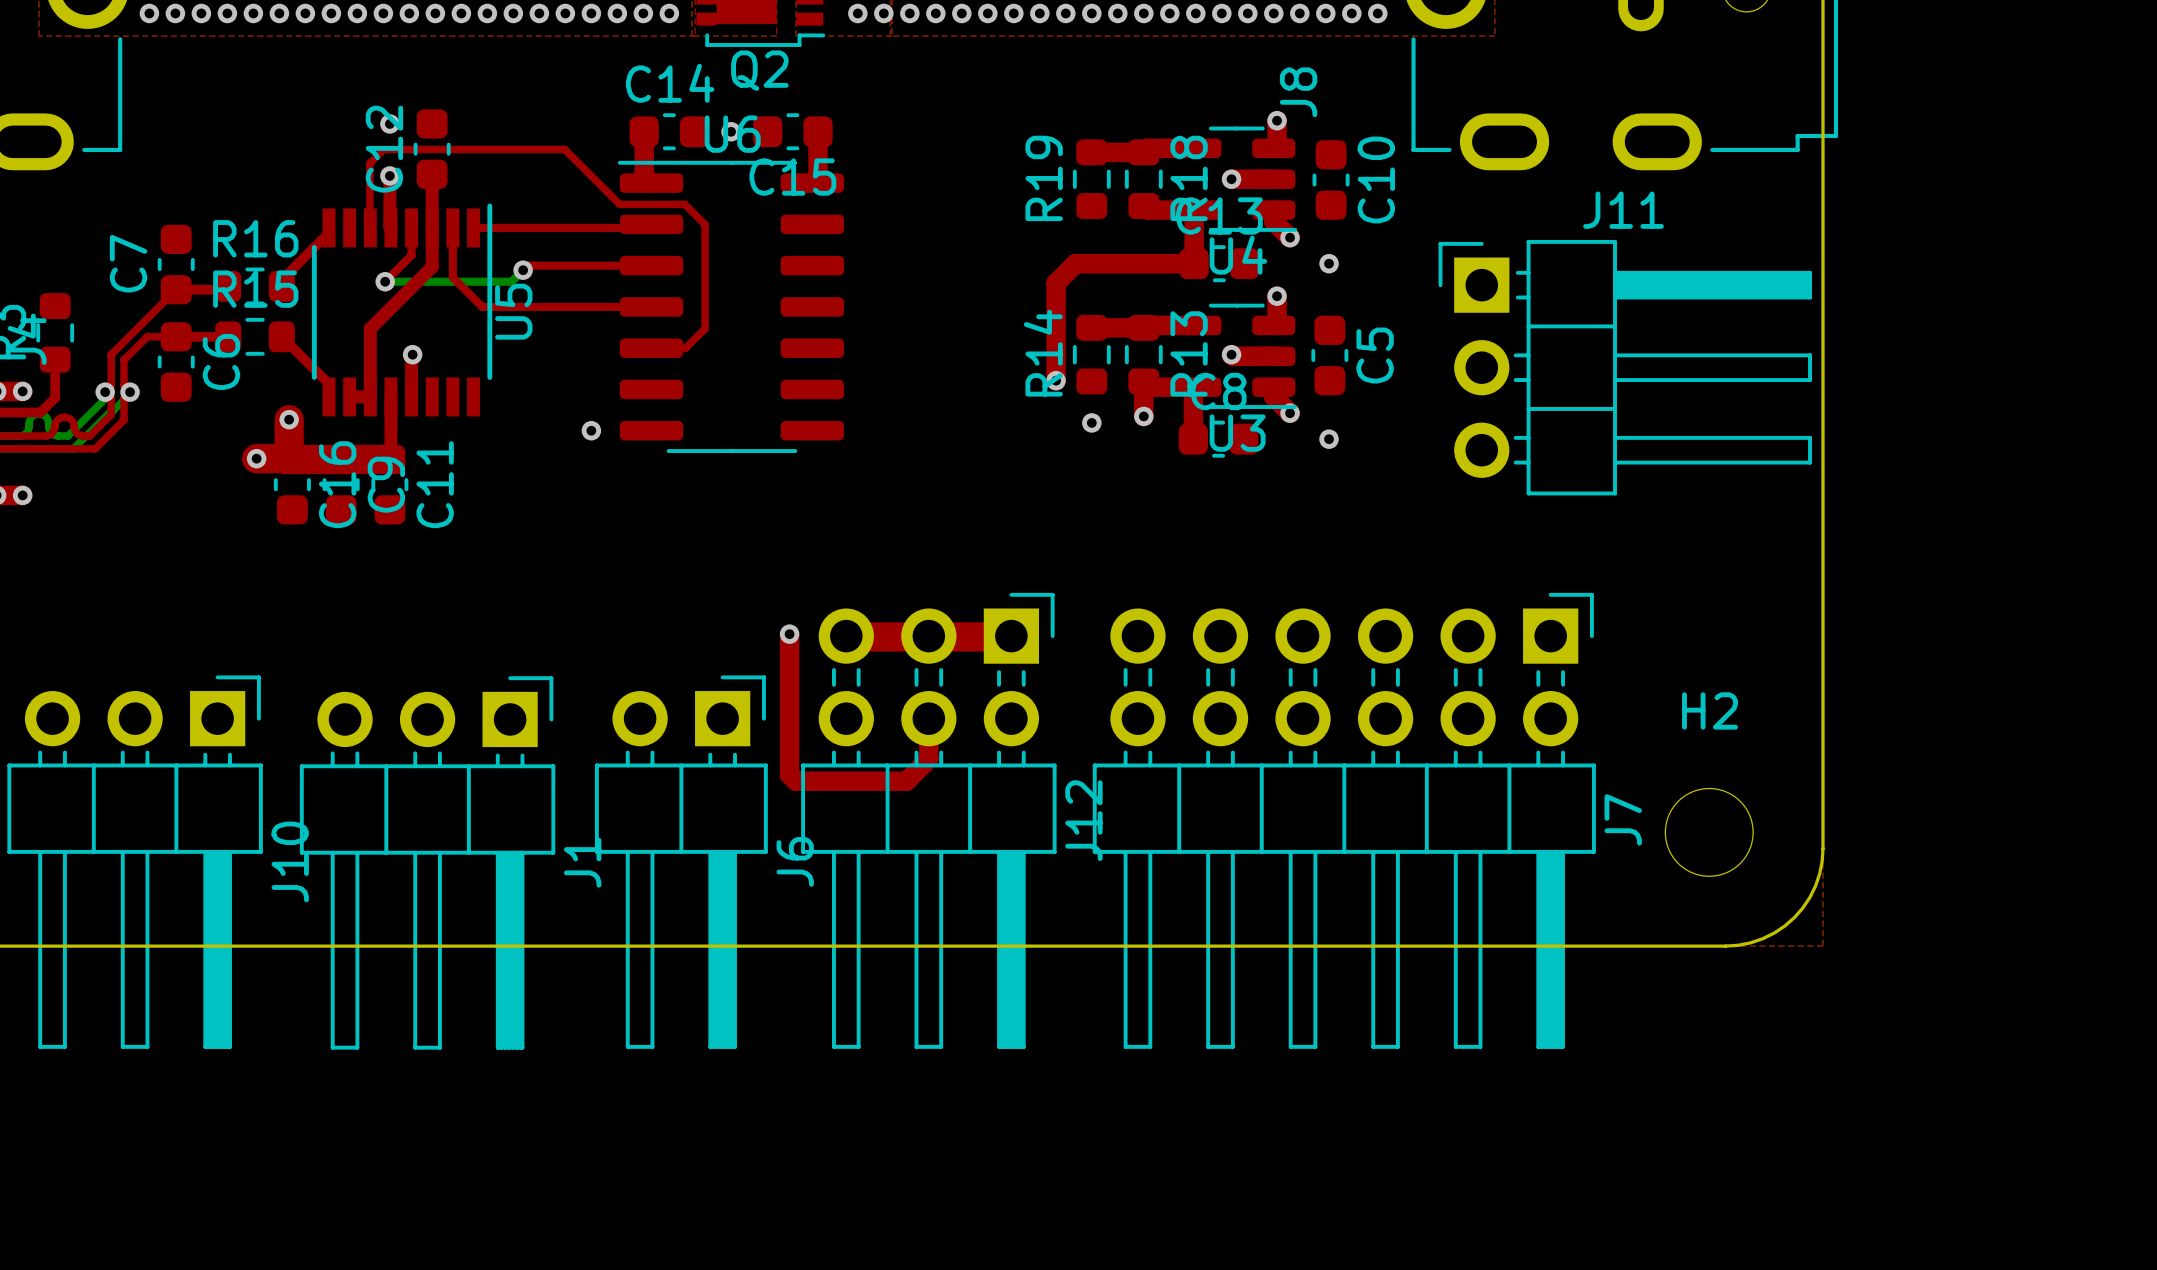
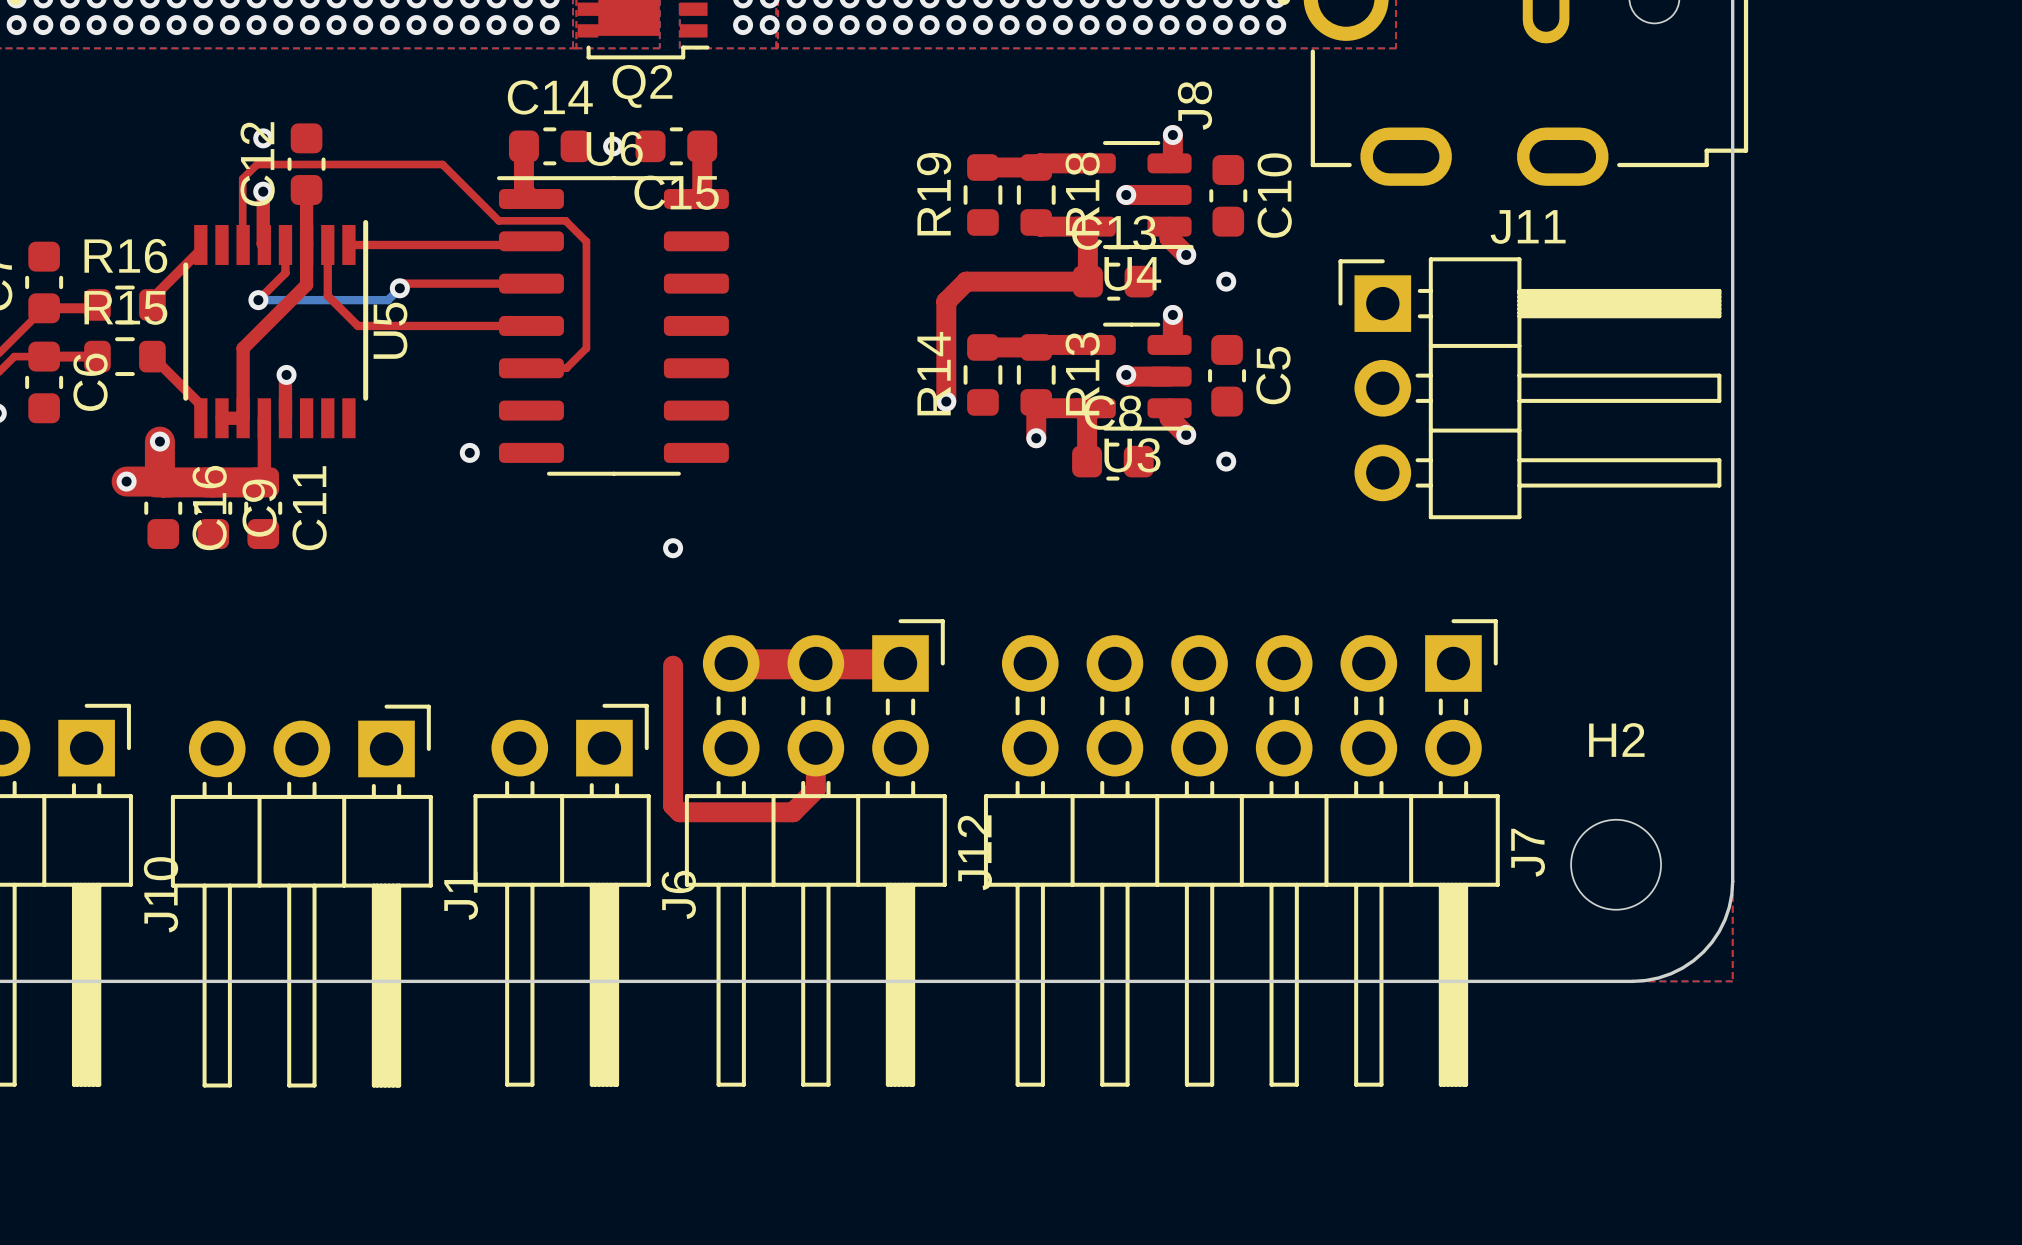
via: (1091, 422) -> none
via position: (789, 634) -> (673, 548)

